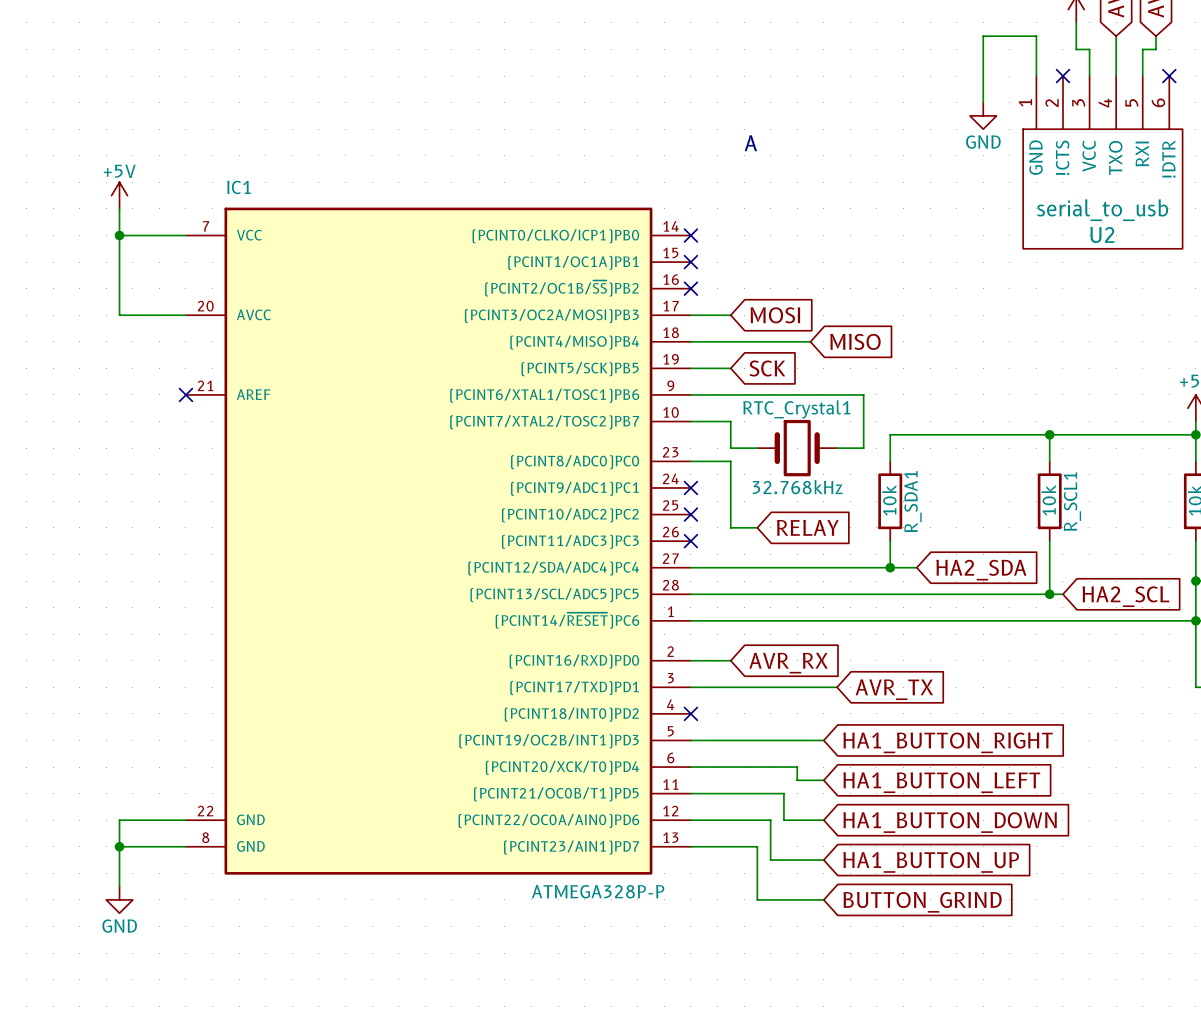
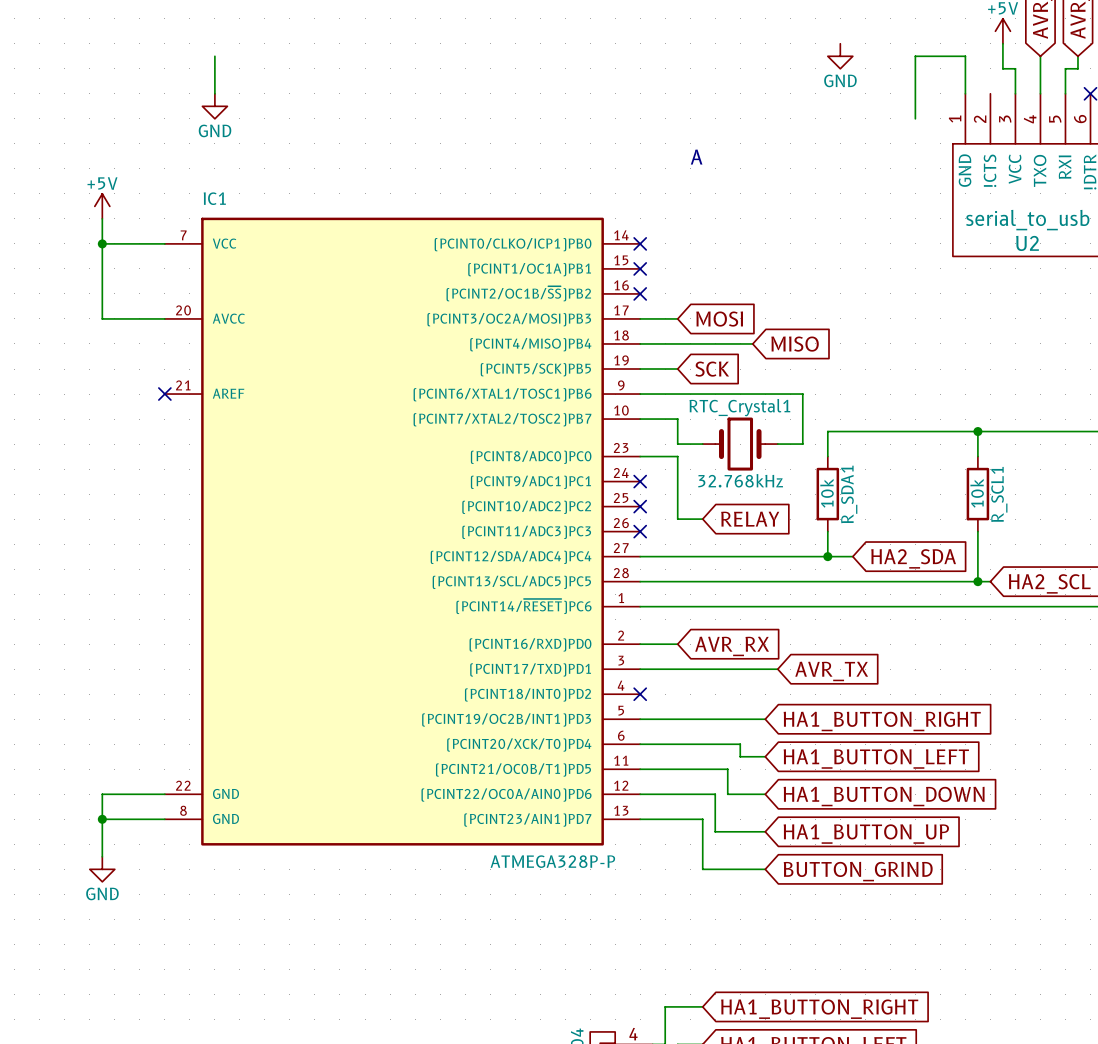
wire: none -> (214, 56) (214, 93)
no-connect mark: (1062, 76) -> none
power symbol: none -> GND (214, 106)
power symbol position: GND (983, 115) -> GND (840, 56)

